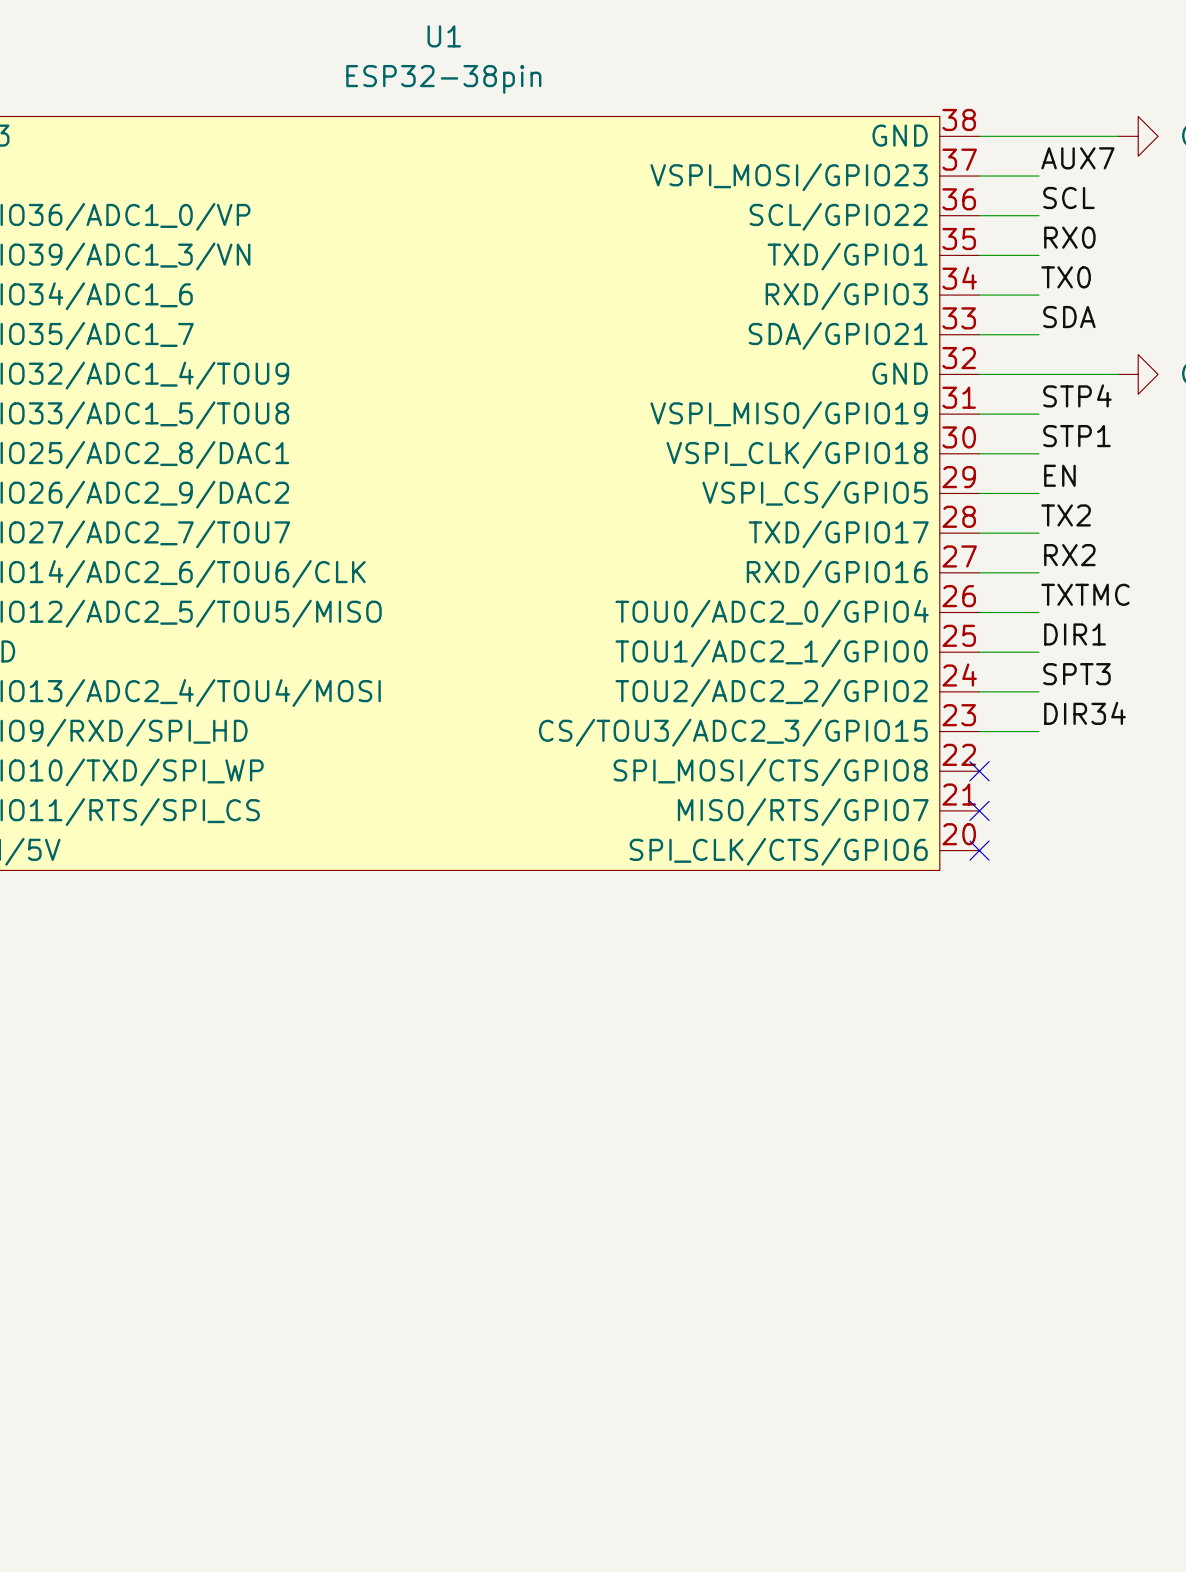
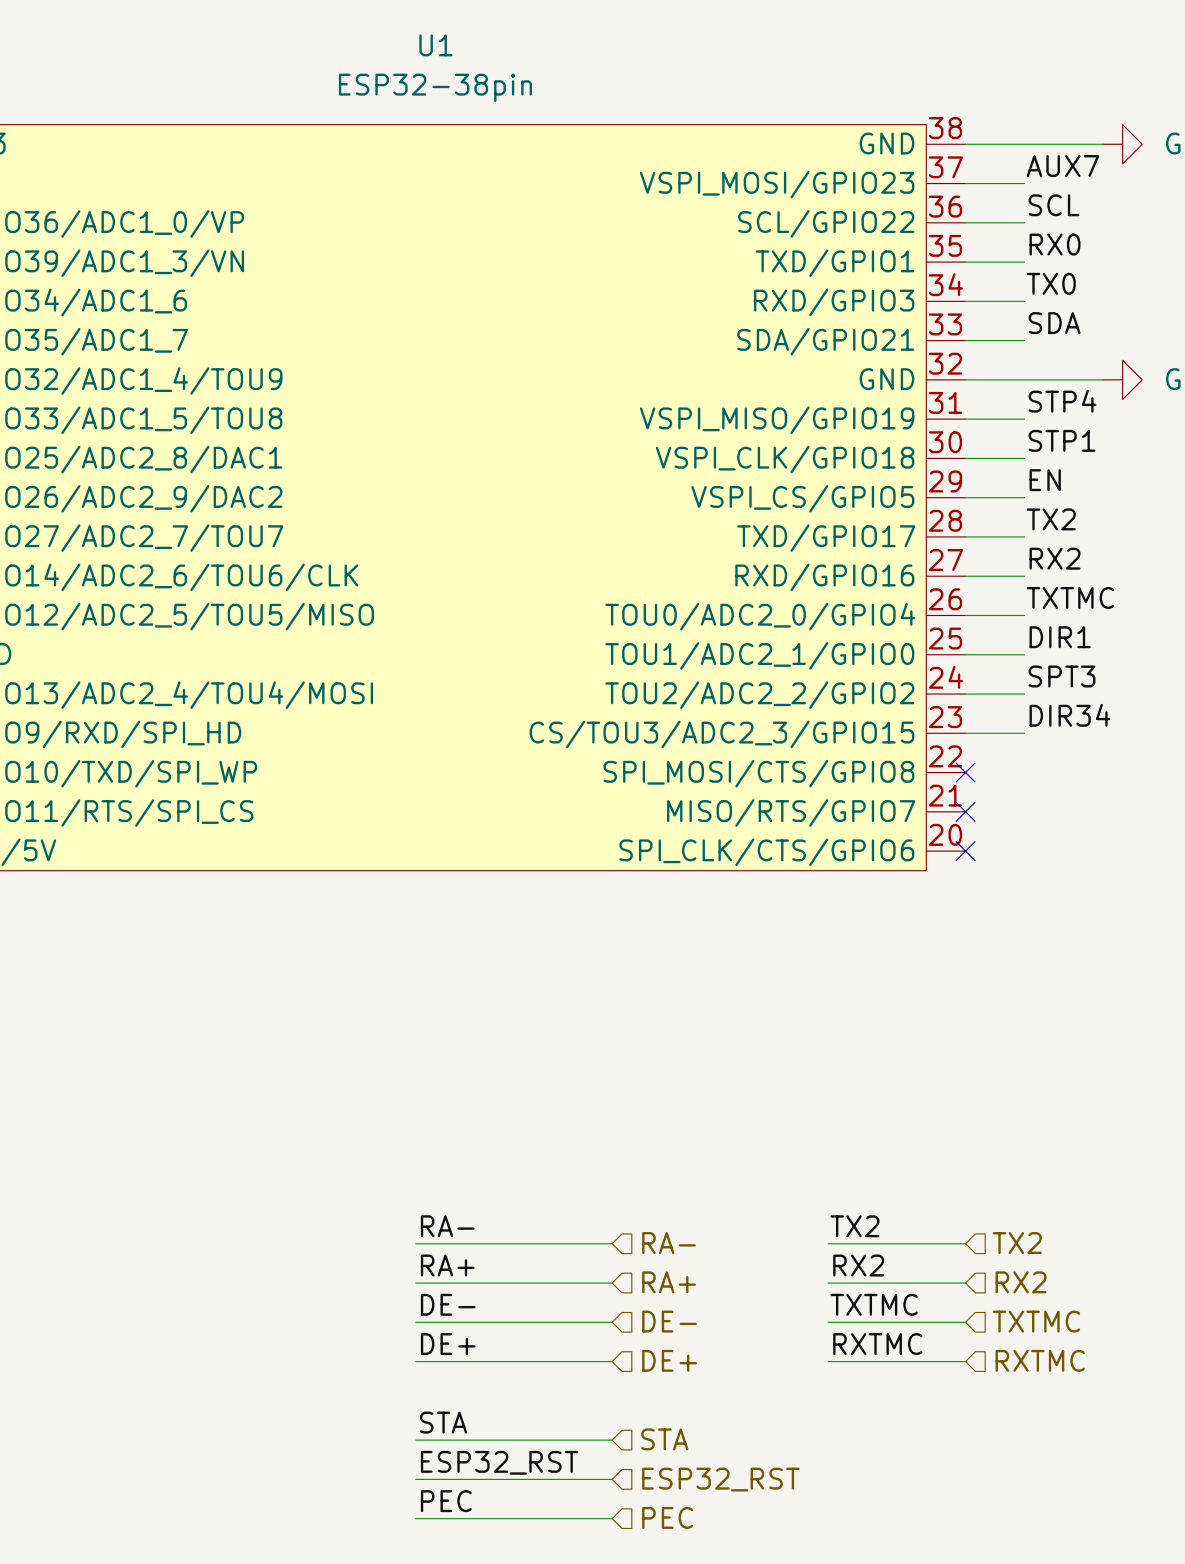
label: none -> RA- (447, 1226)
label: none -> TX2 (854, 1226)
hierarchical label: none -> RA- (669, 1243)
hierarchical label: none -> TX2 (1017, 1243)
wire: none -> (415, 1243) (612, 1243)
wire: none -> (828, 1243) (965, 1243)
label: none -> RA+ (447, 1265)
label: none -> RX2 (858, 1265)
hierarchical label: none -> RA+ (669, 1282)
hierarchical label: none -> RX2 (1021, 1282)
wire: none -> (415, 1283) (612, 1283)
wire: none -> (828, 1283) (965, 1283)
label: none -> DE- (448, 1304)
label: none -> TXTMC (874, 1304)
wire: none -> (415, 1322) (612, 1322)
hierarchical label: none -> DE- (669, 1321)
wire: none -> (828, 1322) (965, 1322)
hierarchical label: none -> TXTMC (1036, 1321)
label: none -> DE+ (448, 1344)
label: none -> RXTMC (877, 1344)
hierarchical label: none -> DE+ (669, 1360)
hierarchical label: none -> RXTMC (1040, 1360)
wire: none -> (415, 1361) (612, 1361)
wire: none -> (828, 1361) (965, 1361)
label: none -> STA (443, 1422)
wire: none -> (415, 1440) (612, 1440)
hierarchical label: none -> STA (664, 1439)
label: none -> ESP32_RST (499, 1462)
wire: none -> (415, 1479) (612, 1479)
hierarchical label: none -> ESP32_RST (720, 1479)
label: none -> PEC (446, 1501)
hierarchical label: none -> PEC (667, 1517)
wire: none -> (415, 1518) (612, 1518)

